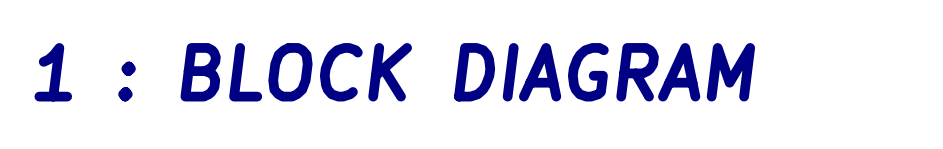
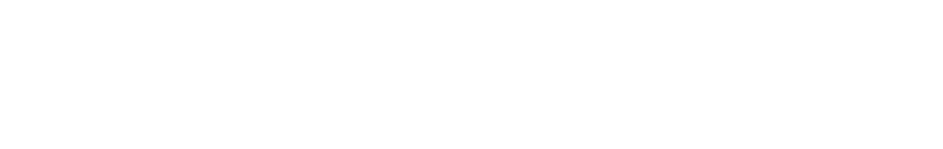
text: 1 : BLOCK DIAGRAM (394, 72) -> none

